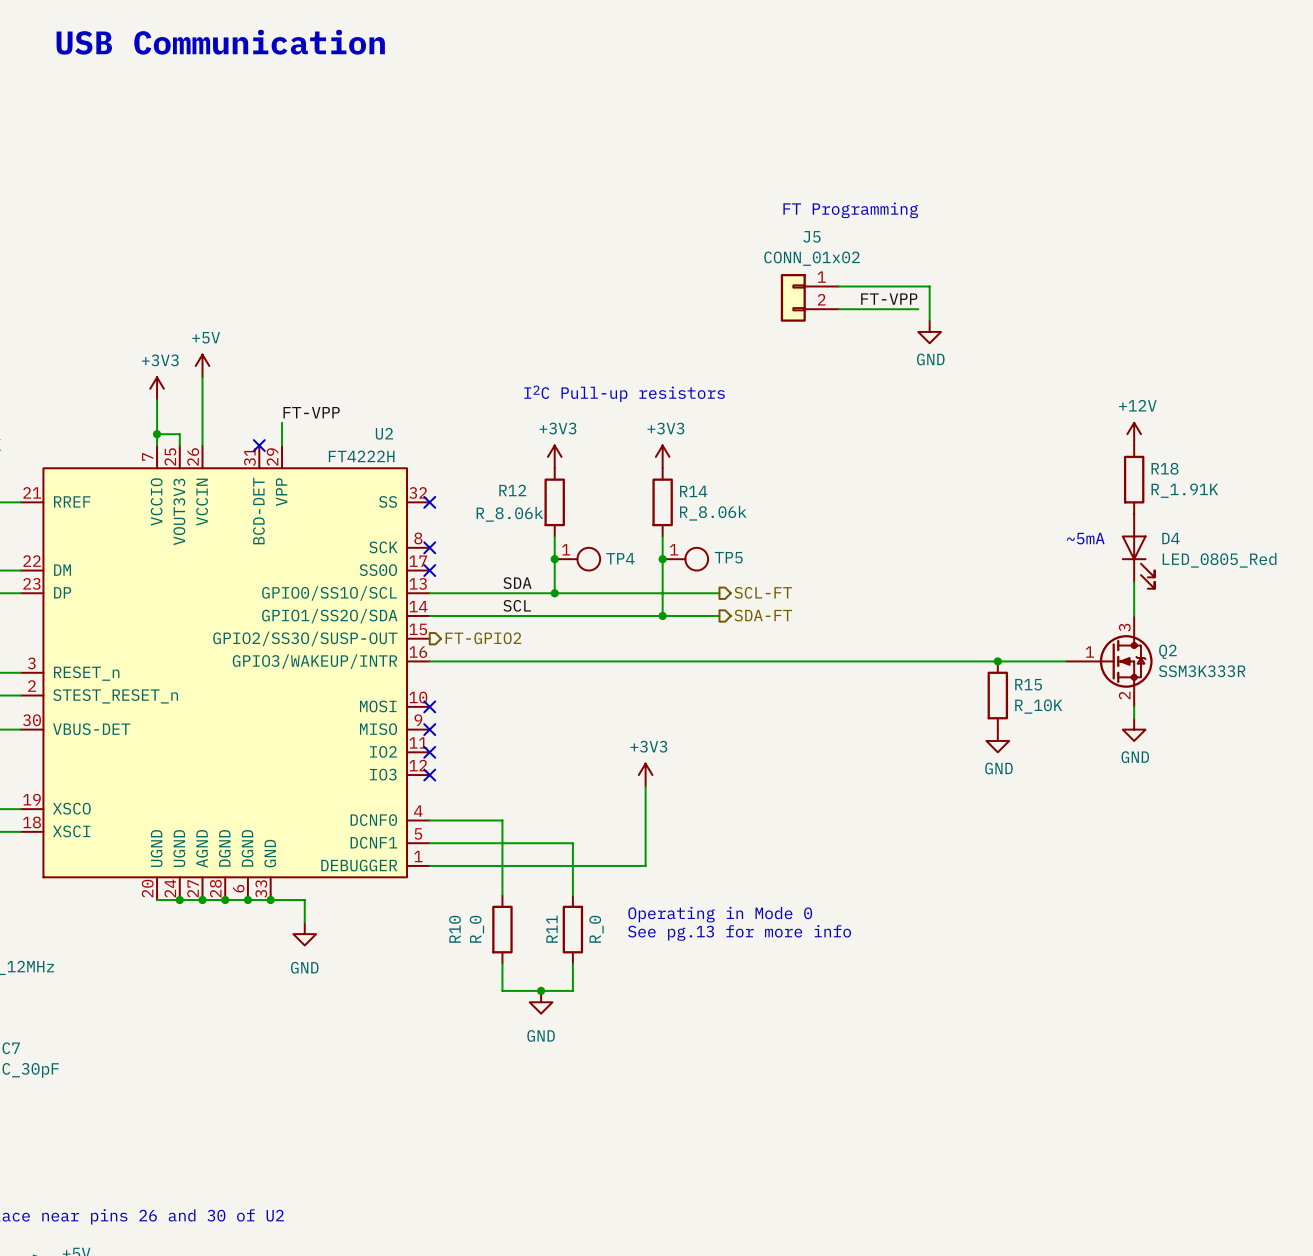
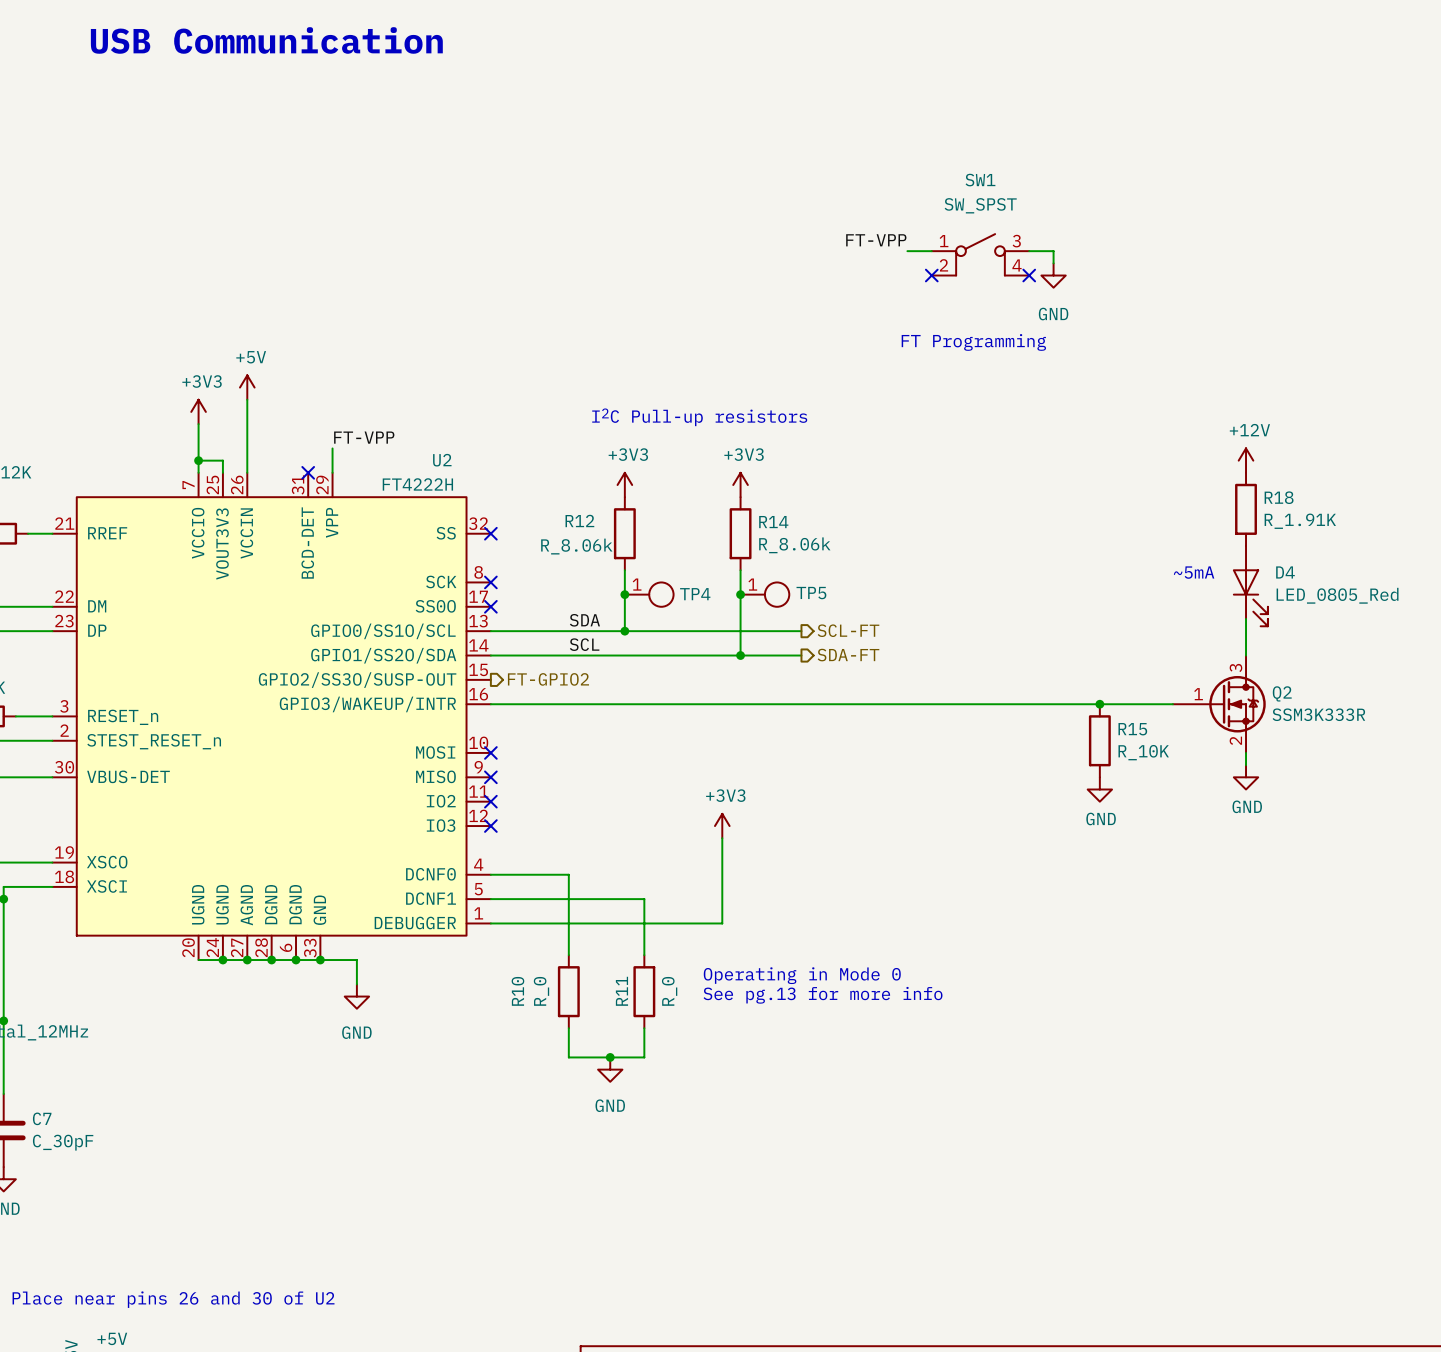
text position: FT Programming (850, 210) -> FT Programming (973, 342)
wire: none -> (907, 251) (931, 251)
wire: none -> (1029, 251) (1053, 251) (1053, 263)
SW1: none -> SW_SPST (980, 254)
no-connect mark: none -> (931, 275)
no-connect mark: none -> (1029, 275)
wire: (838, 286) (929, 286) (929, 320) -> none
J5: CONN_01x02 (809, 297) -> none
label position: FT-VPP (889, 299) -> FT-VPP (876, 240)
wire: (838, 309) (918, 309) -> none
power symbol position: GND (929, 331) -> GND (1053, 275)
power symbol text position: GND (930, 359) -> GND (1053, 314)

